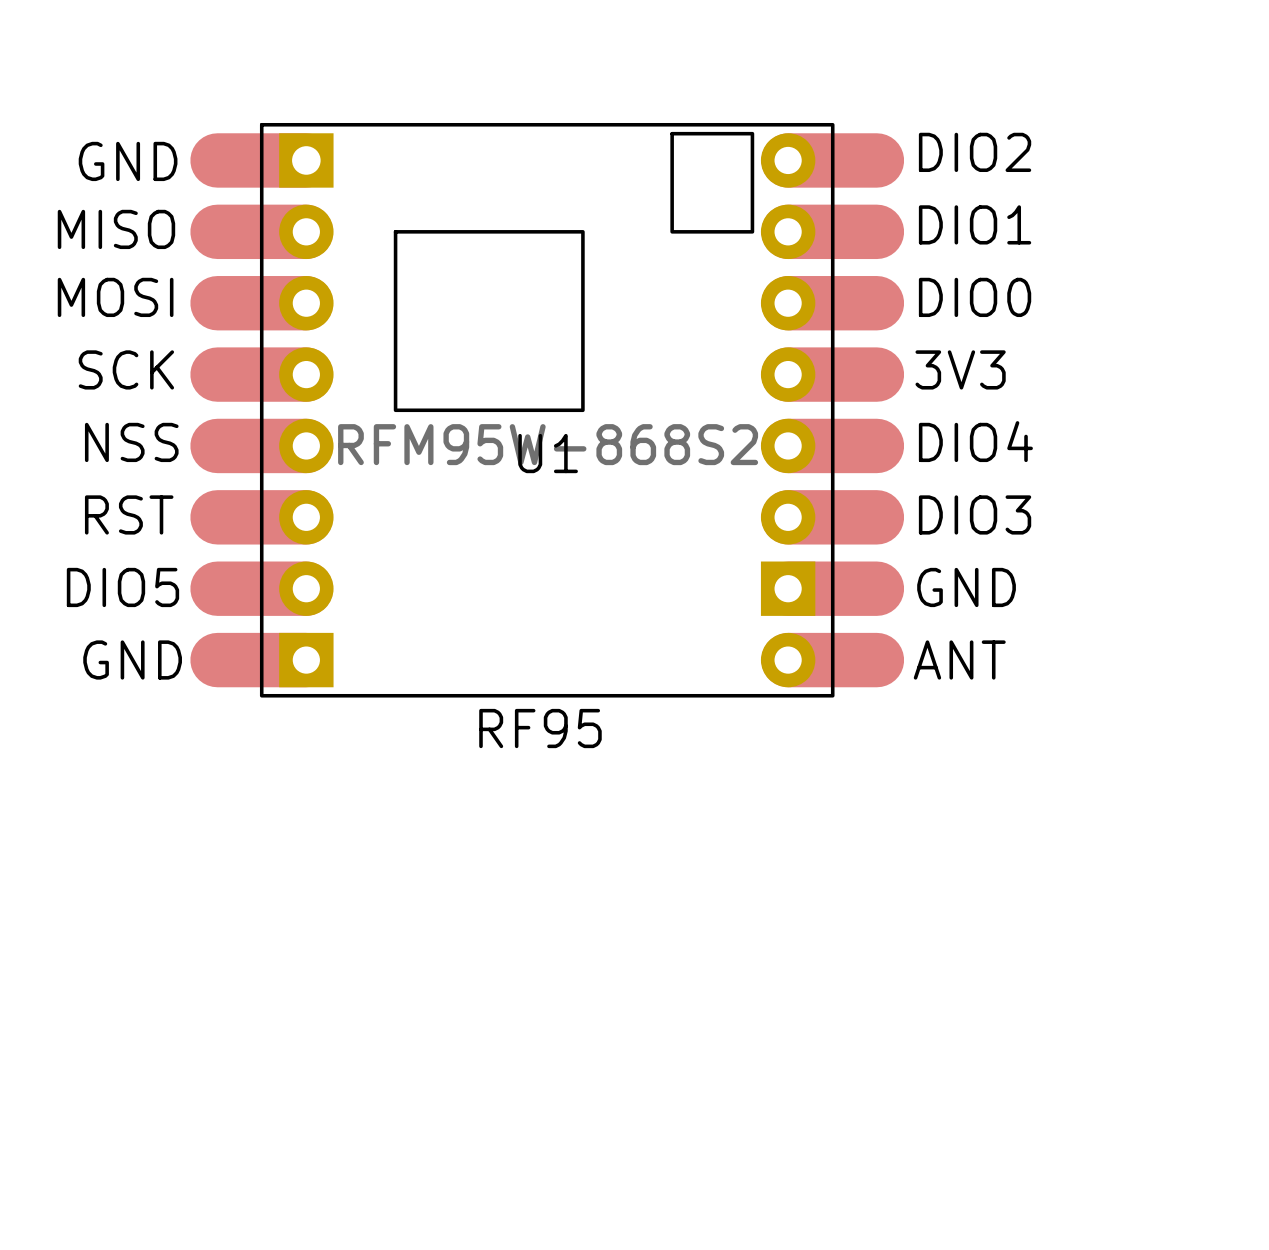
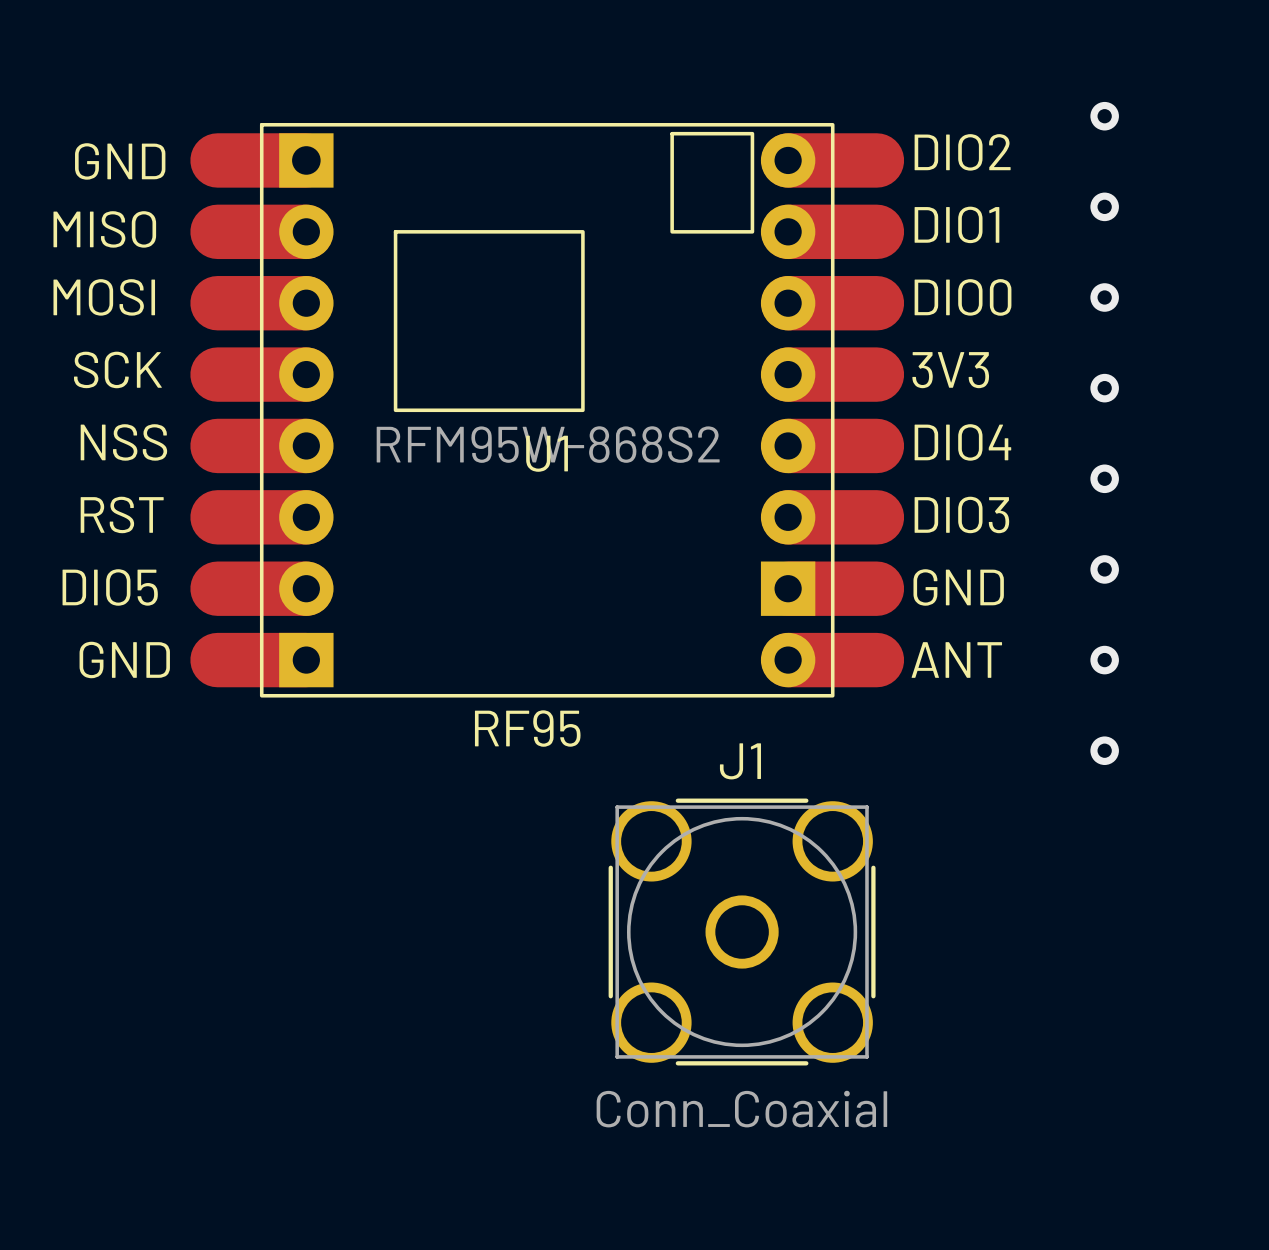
via: none -> (1104, 116)
via: none -> (1104, 206)
via: none -> (1104, 297)
via: none -> (1104, 388)
via: none -> (1104, 478)
via: none -> (1104, 569)
via: none -> (1104, 660)
via: none -> (1104, 750)
J1: none -> Conn_Coaxial (742, 932)

